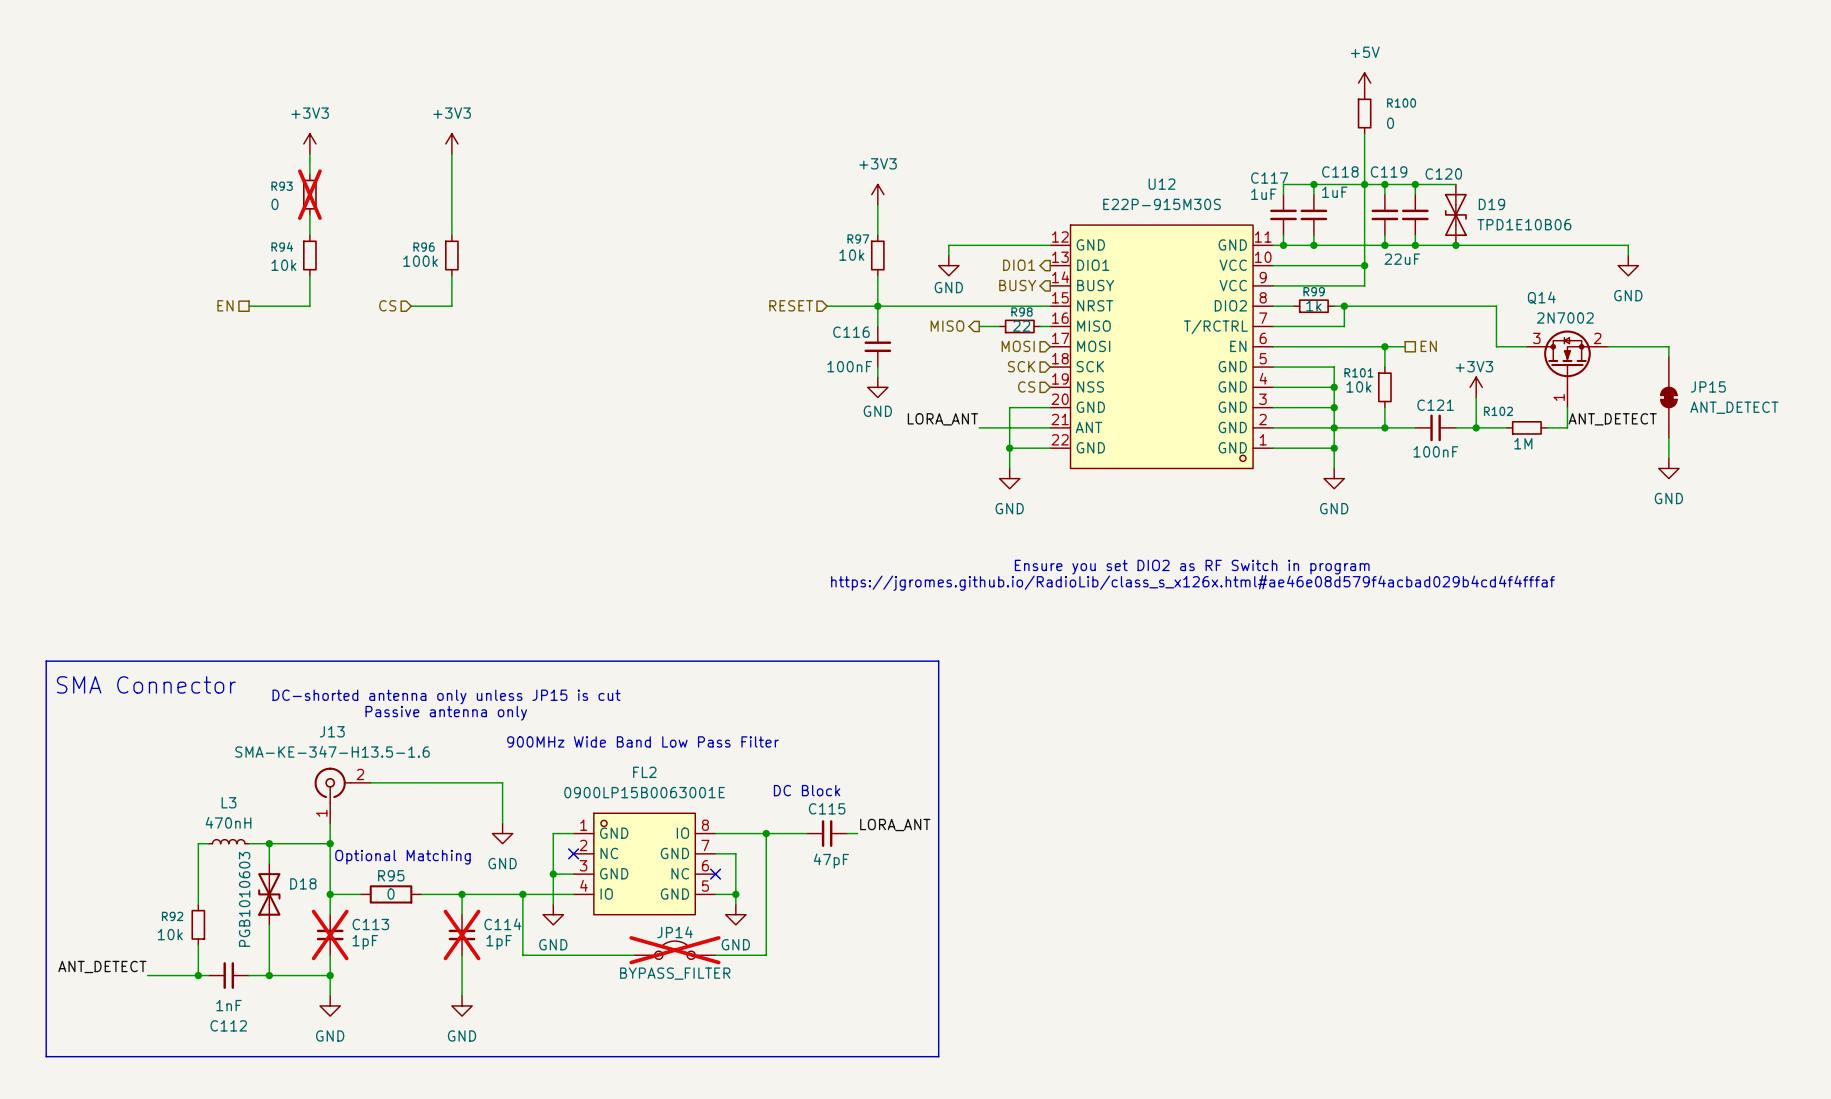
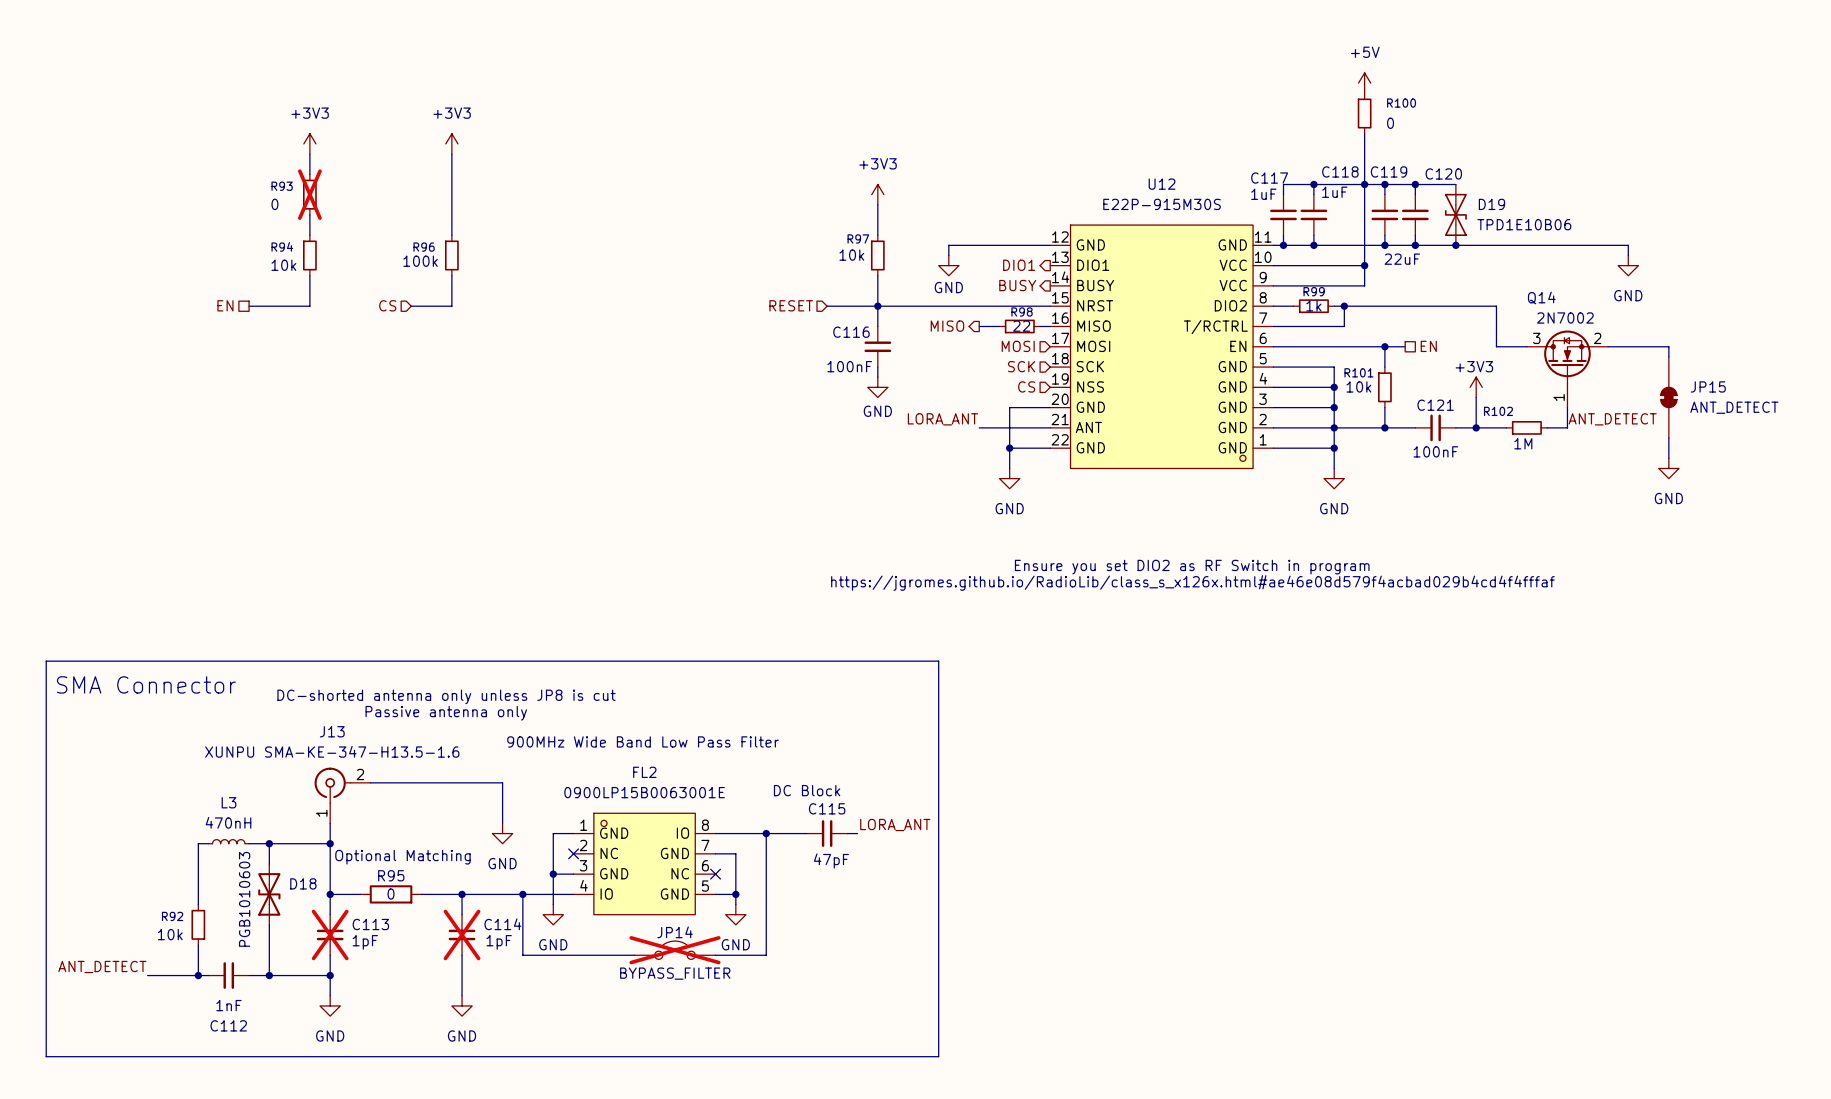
text: DC-shorted antenna only unless JP15 is cut (446, 696) -> DC-shorted antenna only unless JP8 is cut (446, 696)
J13 value: SMA-KE-347-H13.5-1.6 (332, 751) -> XUNPU SMA-KE-347-H13.5-1.6 (332, 751)

